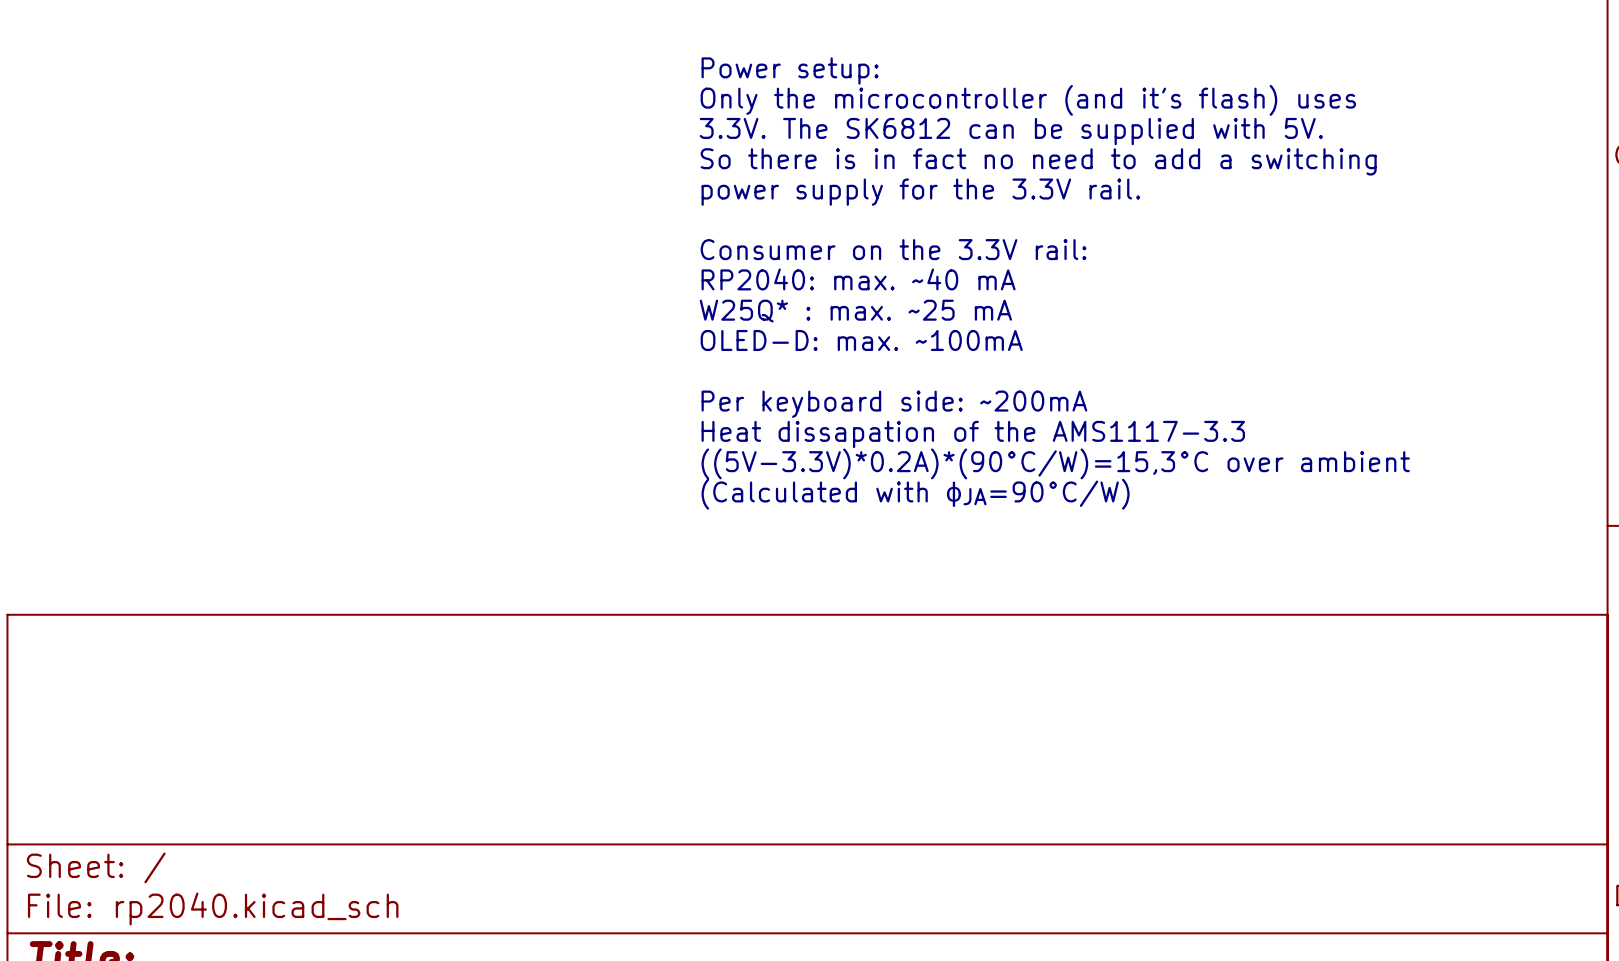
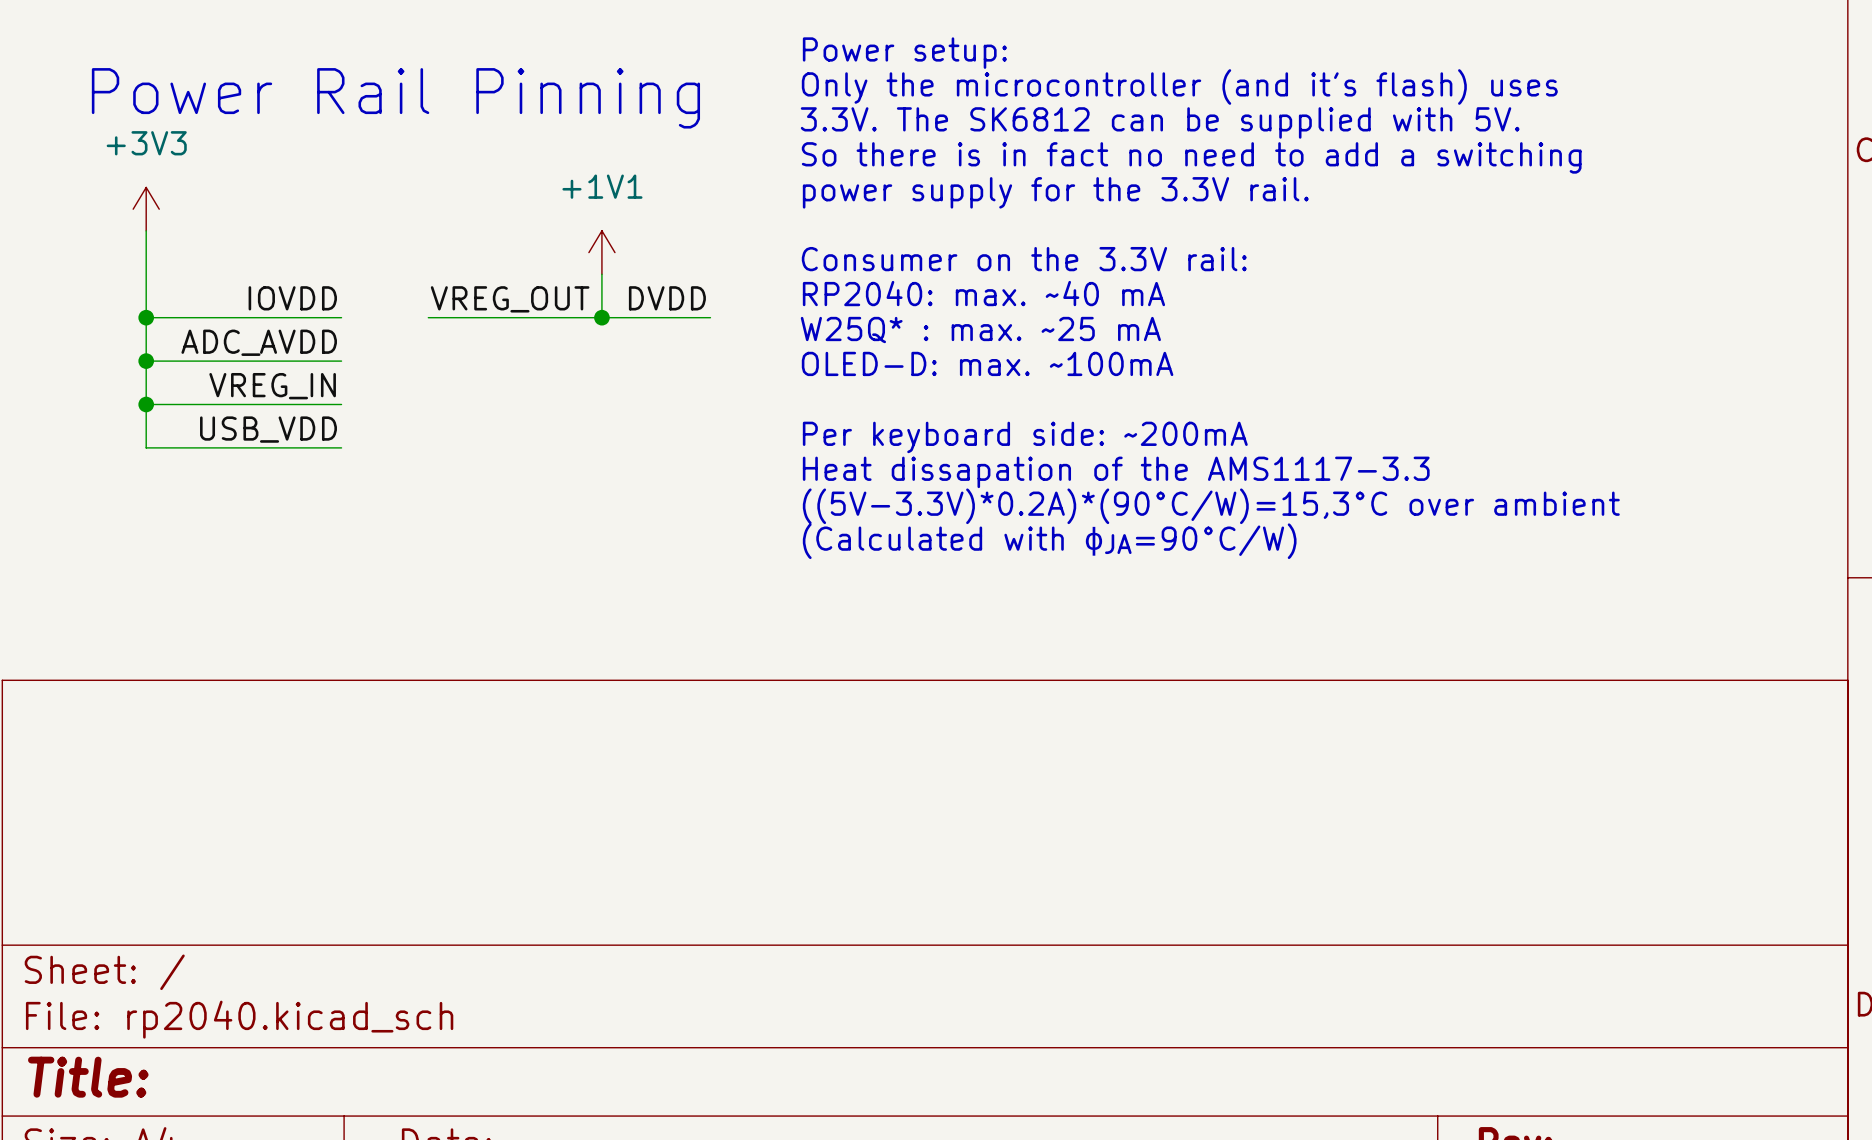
text: none -> Power Rail Pinning (395, 98)
power symbol: none -> +3V3 (146, 209)
wire: none -> (146, 230) (146, 447) (341, 447)
power symbol: none -> +1V1 (601, 252)
wire: none -> (601, 274) (601, 317)
label: none -> IOVDD (292, 298)
label: none -> DVDD (667, 298)
label: none -> VREG_OUT (510, 299)
wire: none -> (146, 317) (341, 317)
junction: none -> (146, 317)
wire: none -> (428, 317) (710, 317)
junction: none -> (601, 317)
label: none -> ADC_AVDD (259, 342)
wire: none -> (146, 361) (341, 361)
junction: none -> (146, 361)
label: none -> VREG_IN (272, 386)
wire: none -> (146, 404) (341, 404)
junction: none -> (146, 404)
label: none -> USB_VDD (268, 429)

